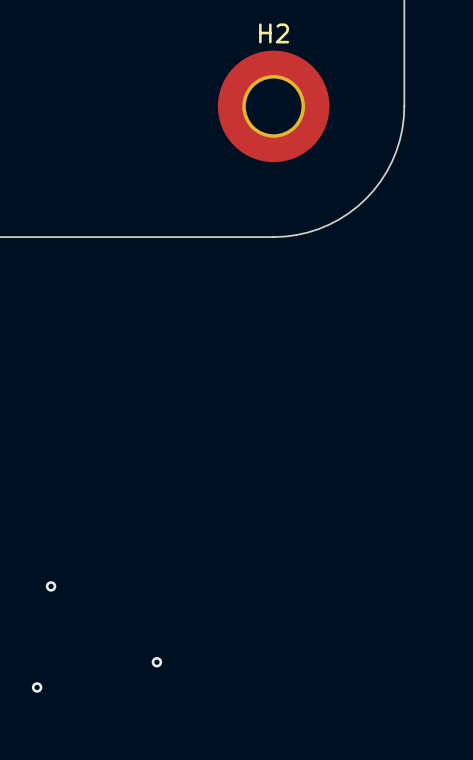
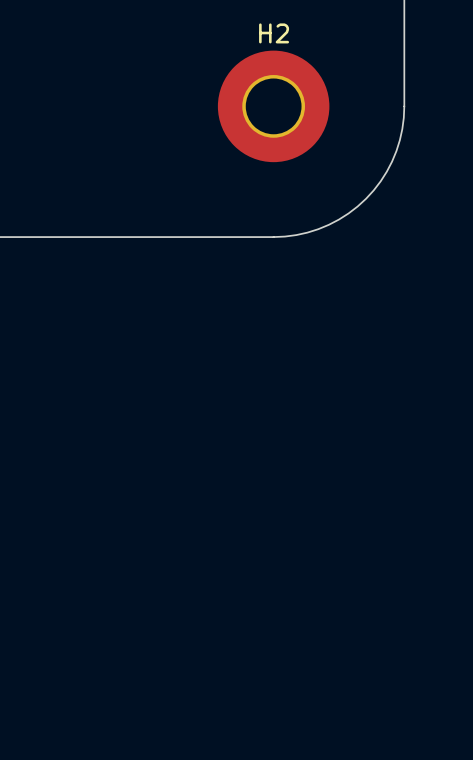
via: (51, 586) -> none
via: (156, 662) -> none
via: (37, 687) -> none

